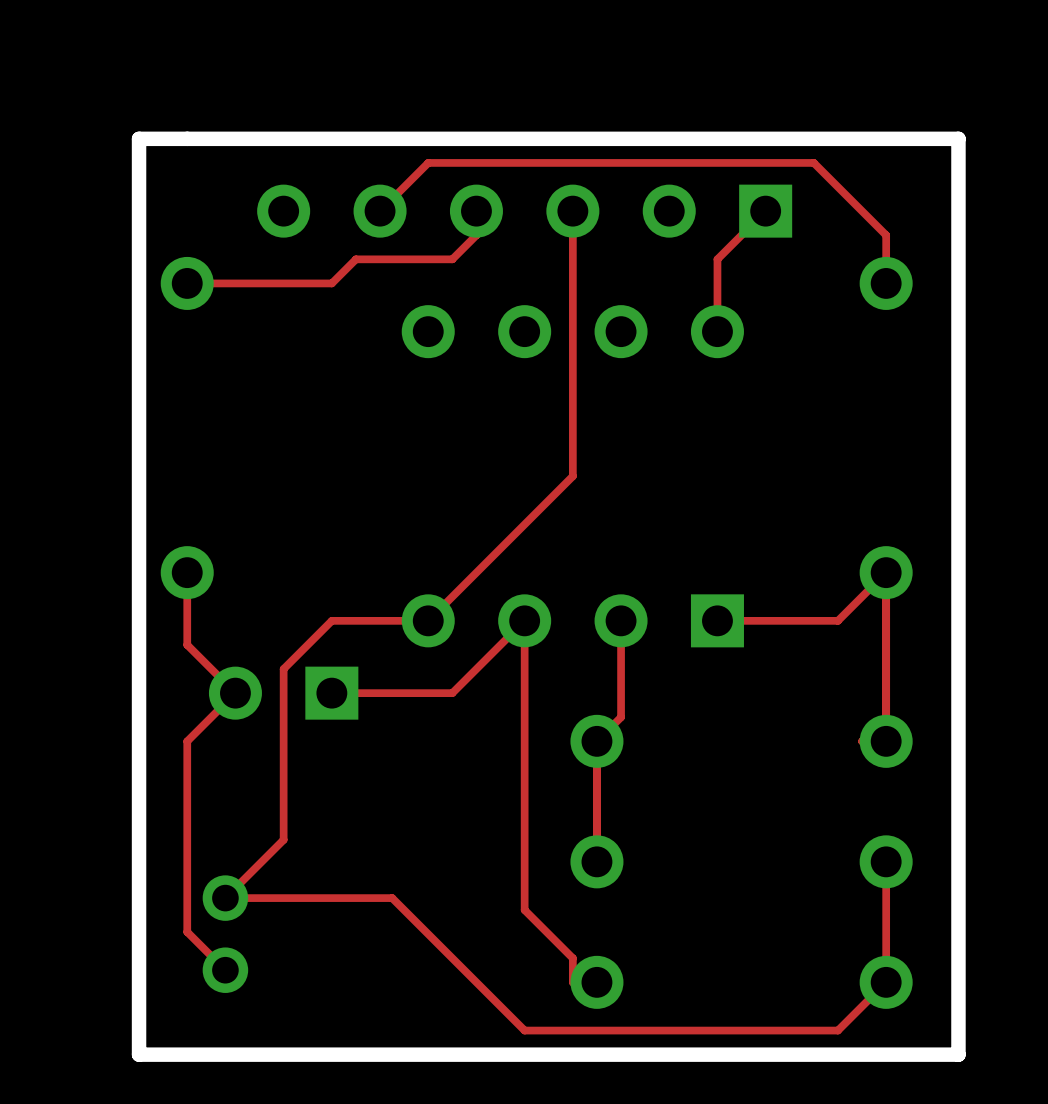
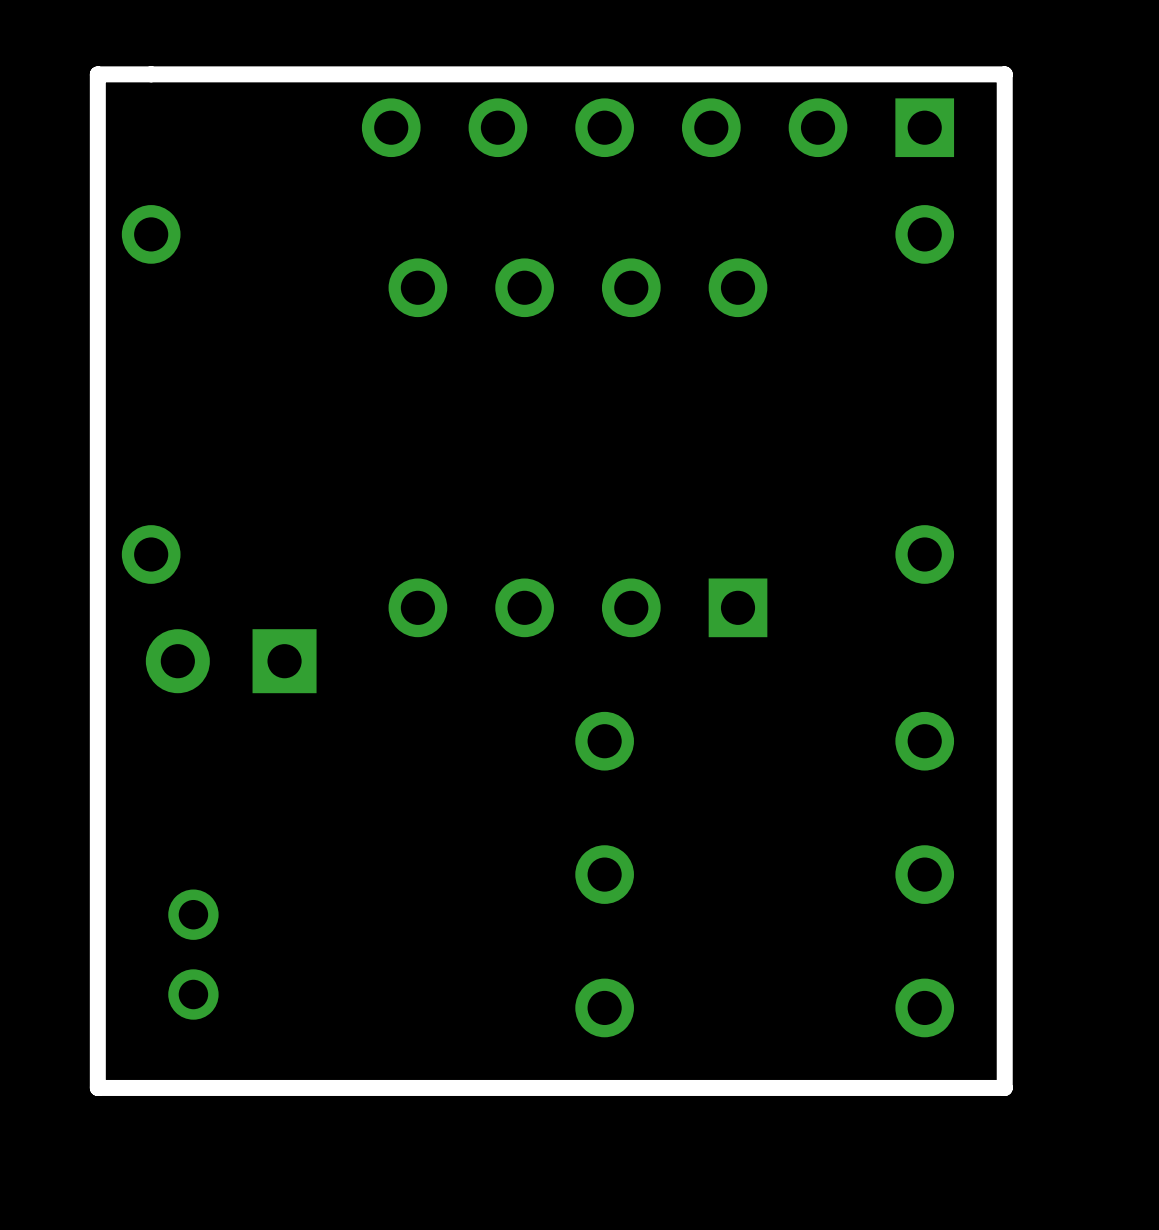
top track: (380, 211) (428, 162) (813, 162) (886, 235) (886, 283) -> none
top track: (476, 211) (476, 235) (452, 259) (355, 259) (331, 283) (187, 283) -> none
part position: (524, 211) -> (657, 127)
top track: (572, 211) (572, 476) (428, 620) (331, 620) (283, 669) (283, 839) (225, 898) (392, 898) (524, 1030) (837, 1030) (886, 982) (886, 861) -> none
top track: (765, 211) (717, 259) (717, 331) -> none
top track: (187, 572) (187, 644) (235, 693) (187, 741) (187, 932) (225, 970) -> none
top track: (621, 620) (621, 717) (596, 741) (596, 861) -> none
top track: (717, 620) (837, 620) (886, 572) (886, 741) (862, 741) (886, 717) -> none
part footprint: [208, 666, 359, 720] -> [145, 629, 317, 694]
top track: (331, 693) (452, 693) (524, 620) (524, 910) (572, 958) (572, 982) (596, 982) -> none

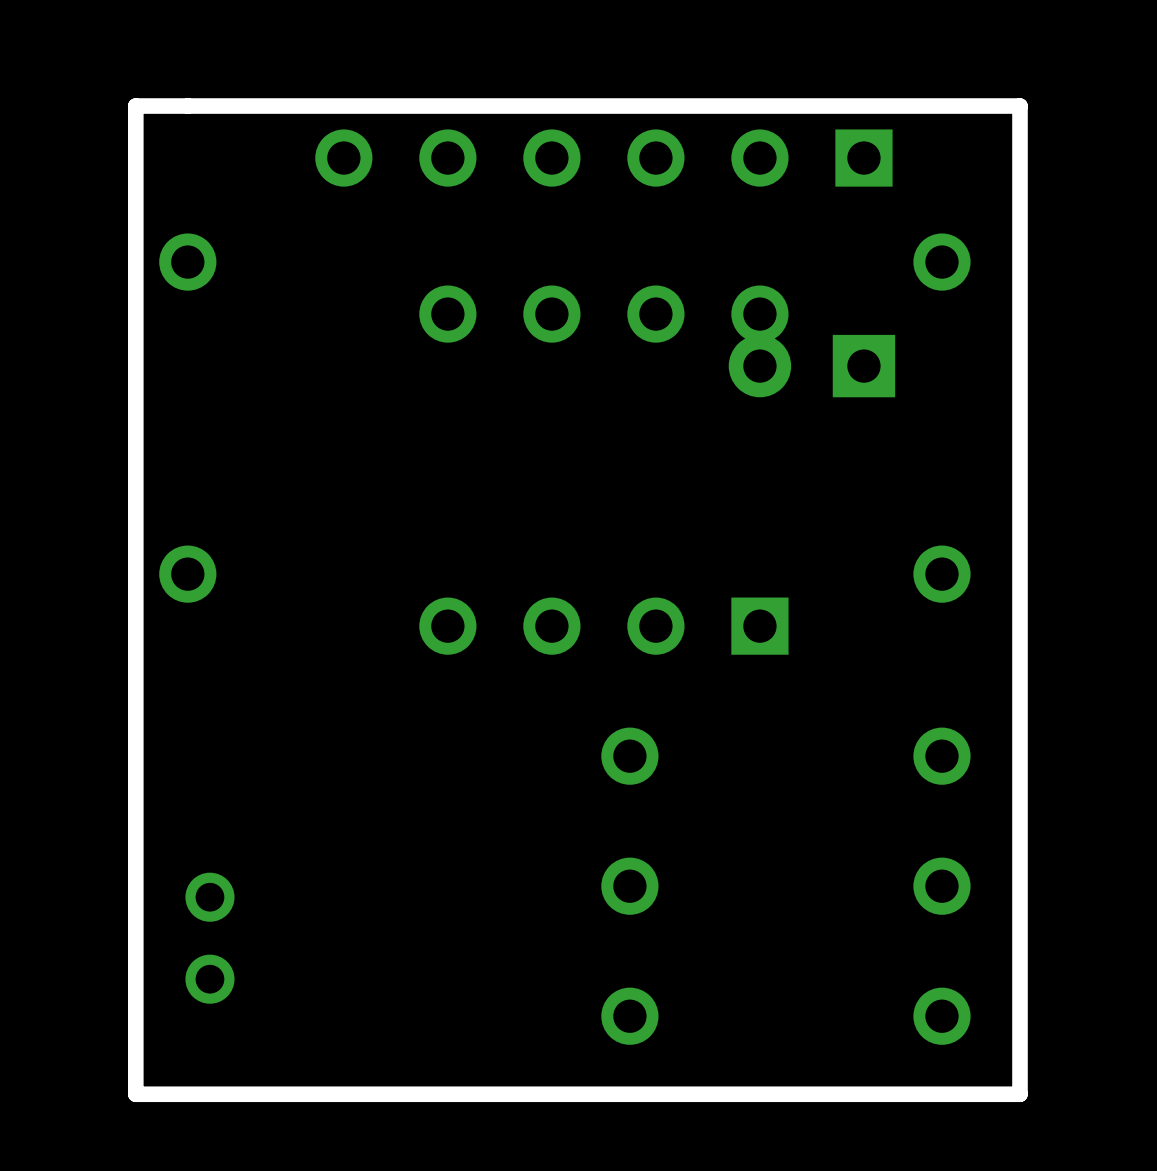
part position: (657, 127) -> (603, 158)
part position: (231, 661) -> (811, 366)
part footprint: [168, 889, 219, 1020] -> [185, 872, 235, 1004]

